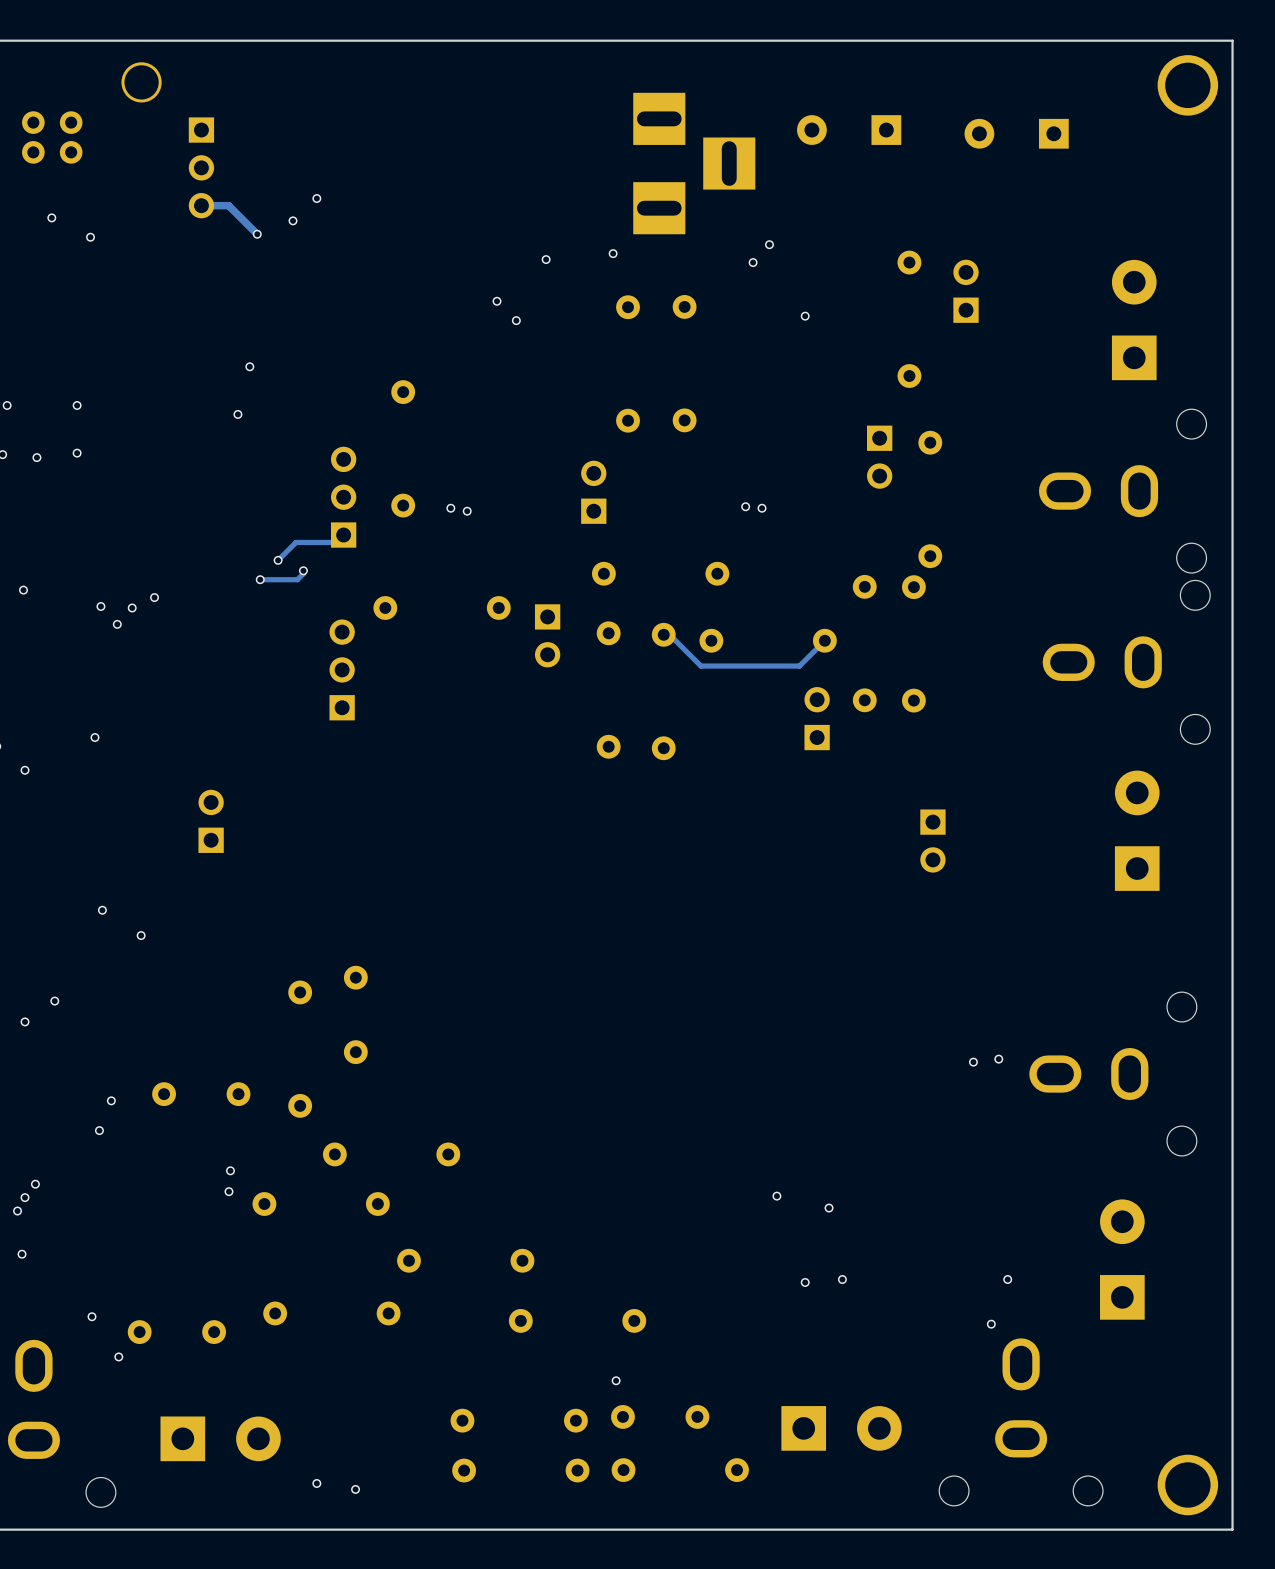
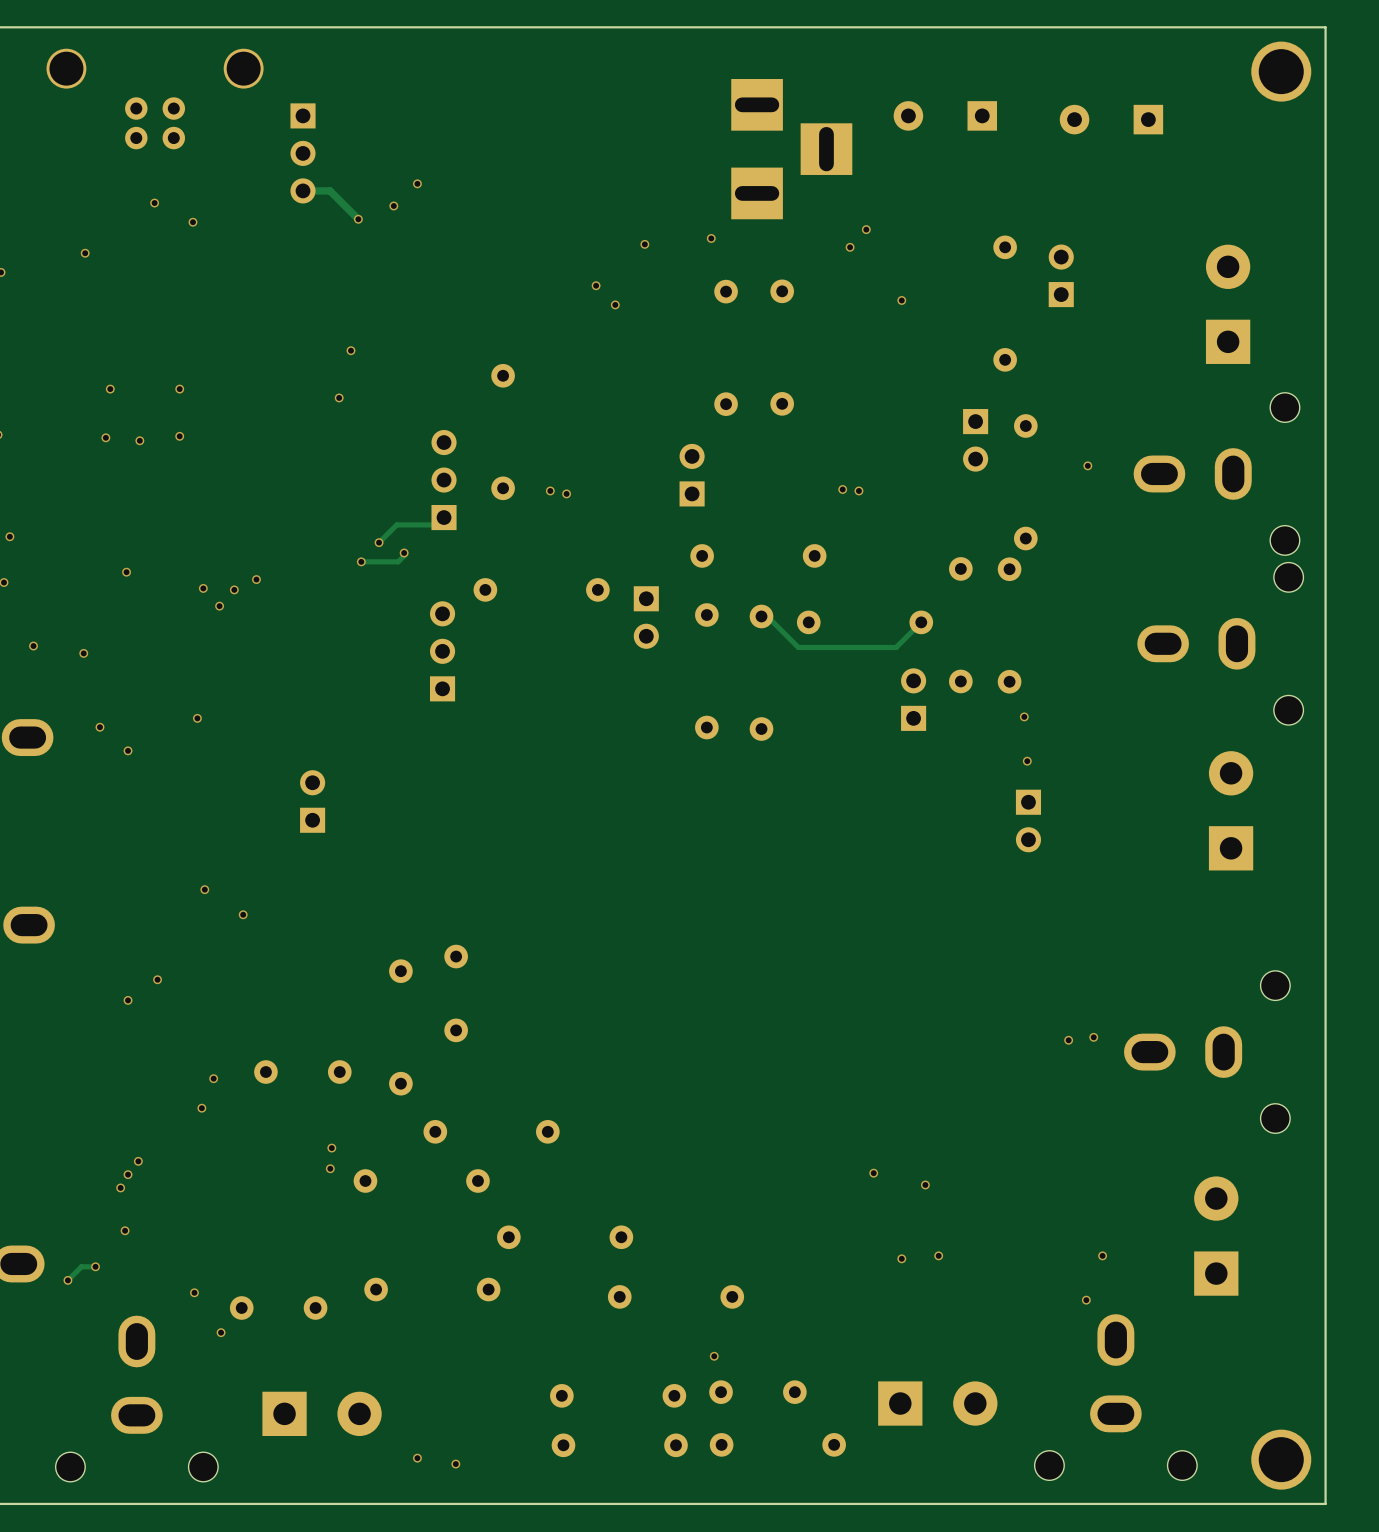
via: none -> (1087, 465)
via: none -> (1024, 716)
via: none -> (1027, 761)

